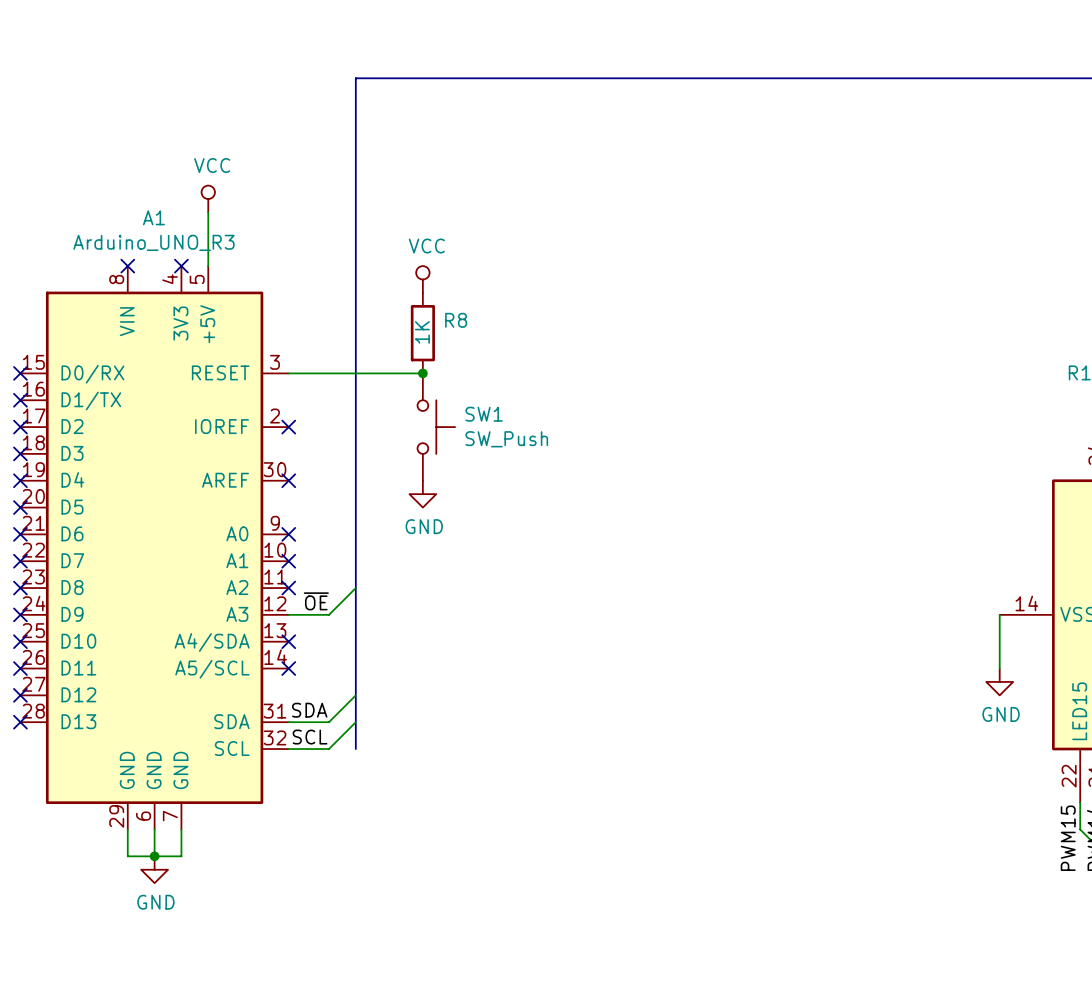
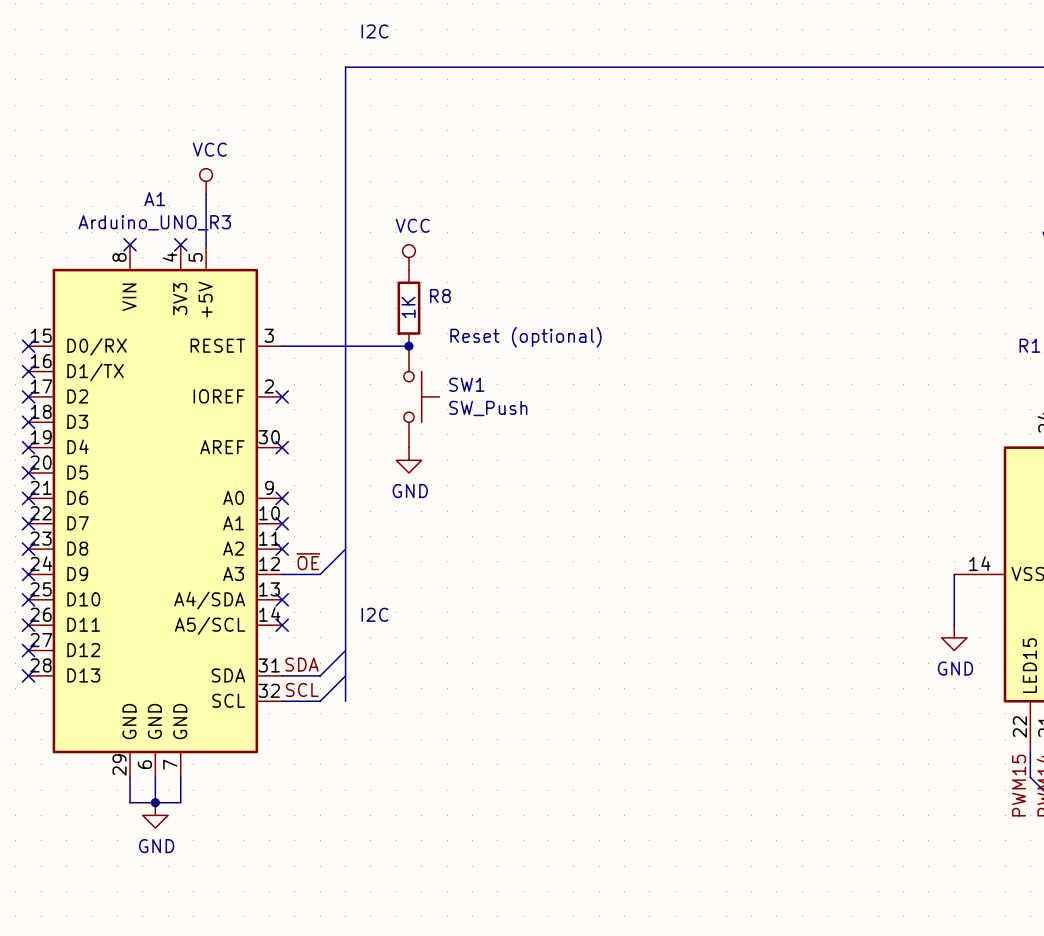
text: none -> I2C (374, 31)
text: none -> Reset (optional) (525, 337)
text: none -> I2C (374, 614)

